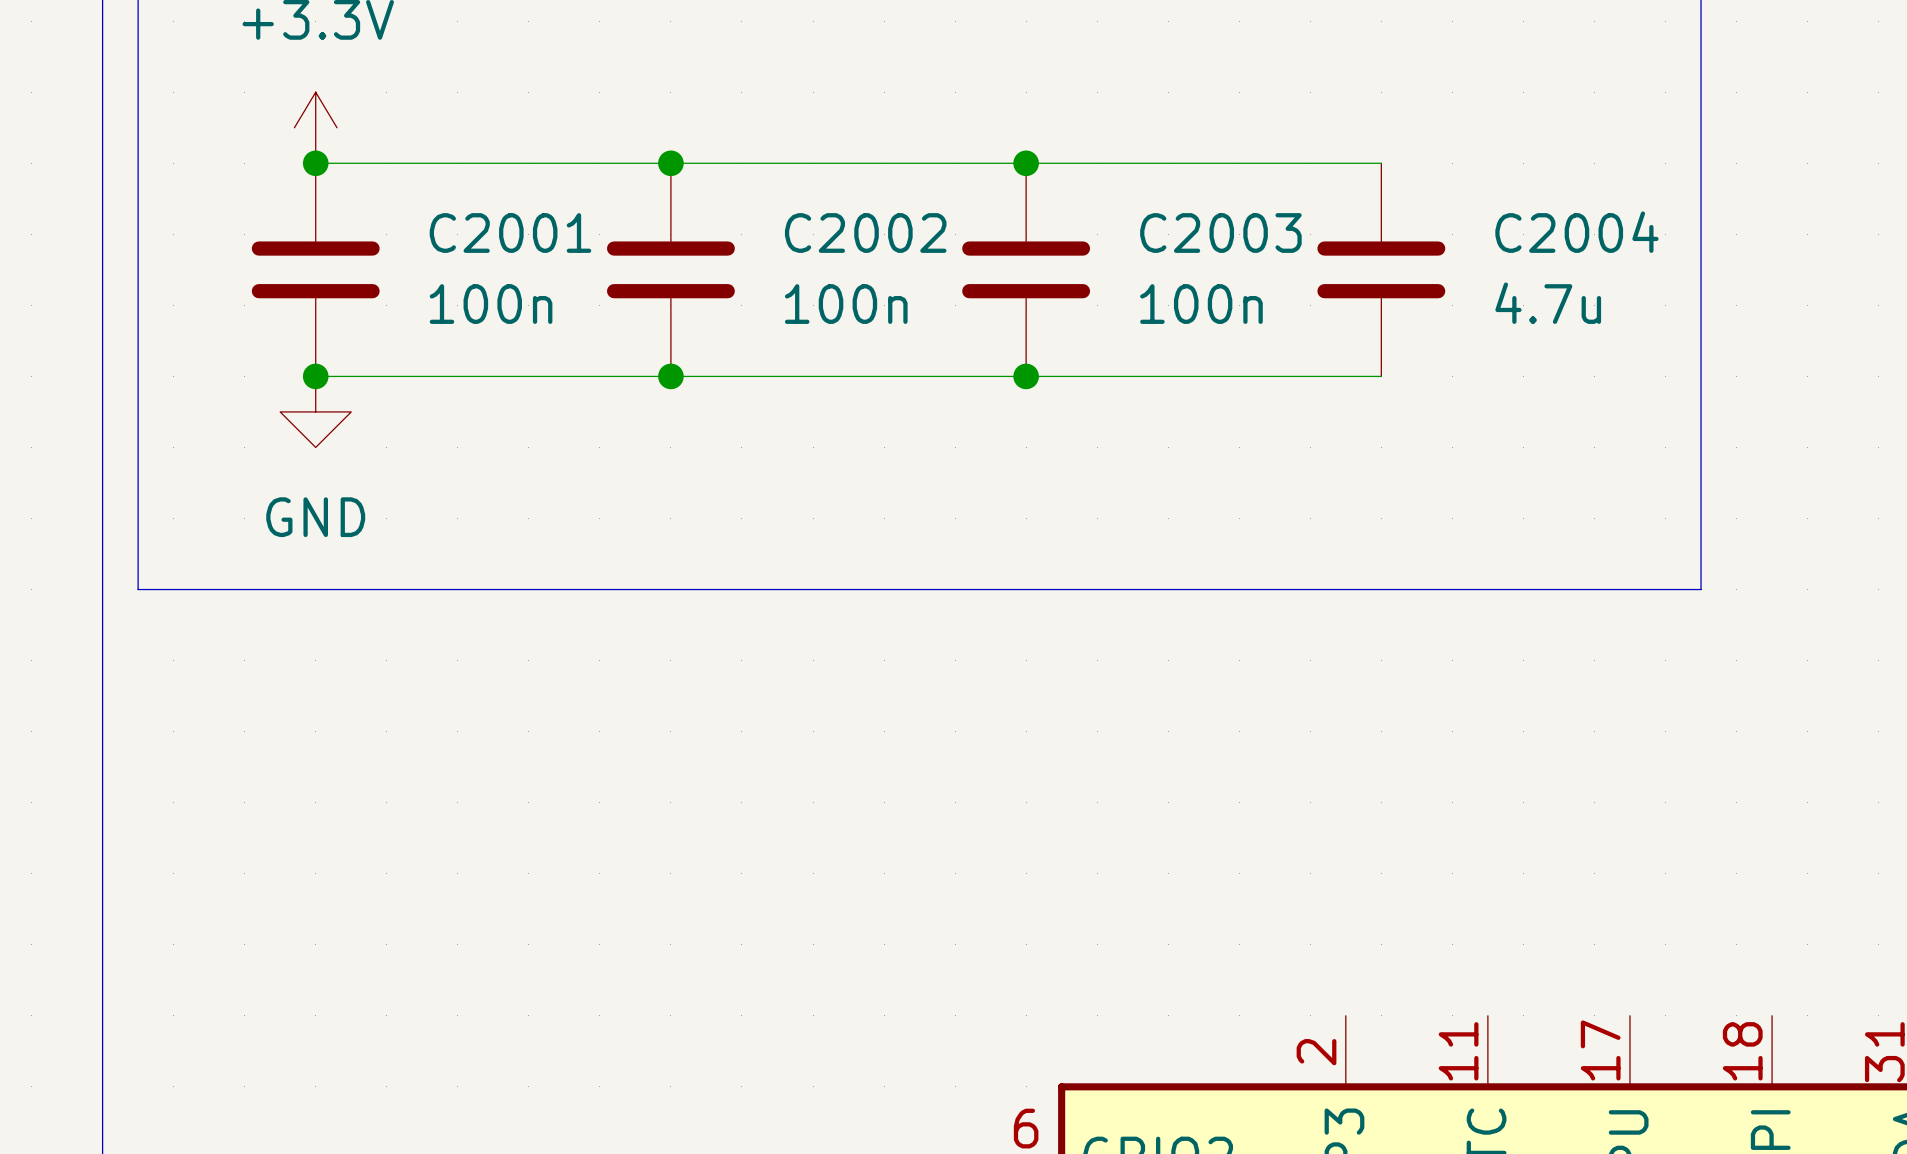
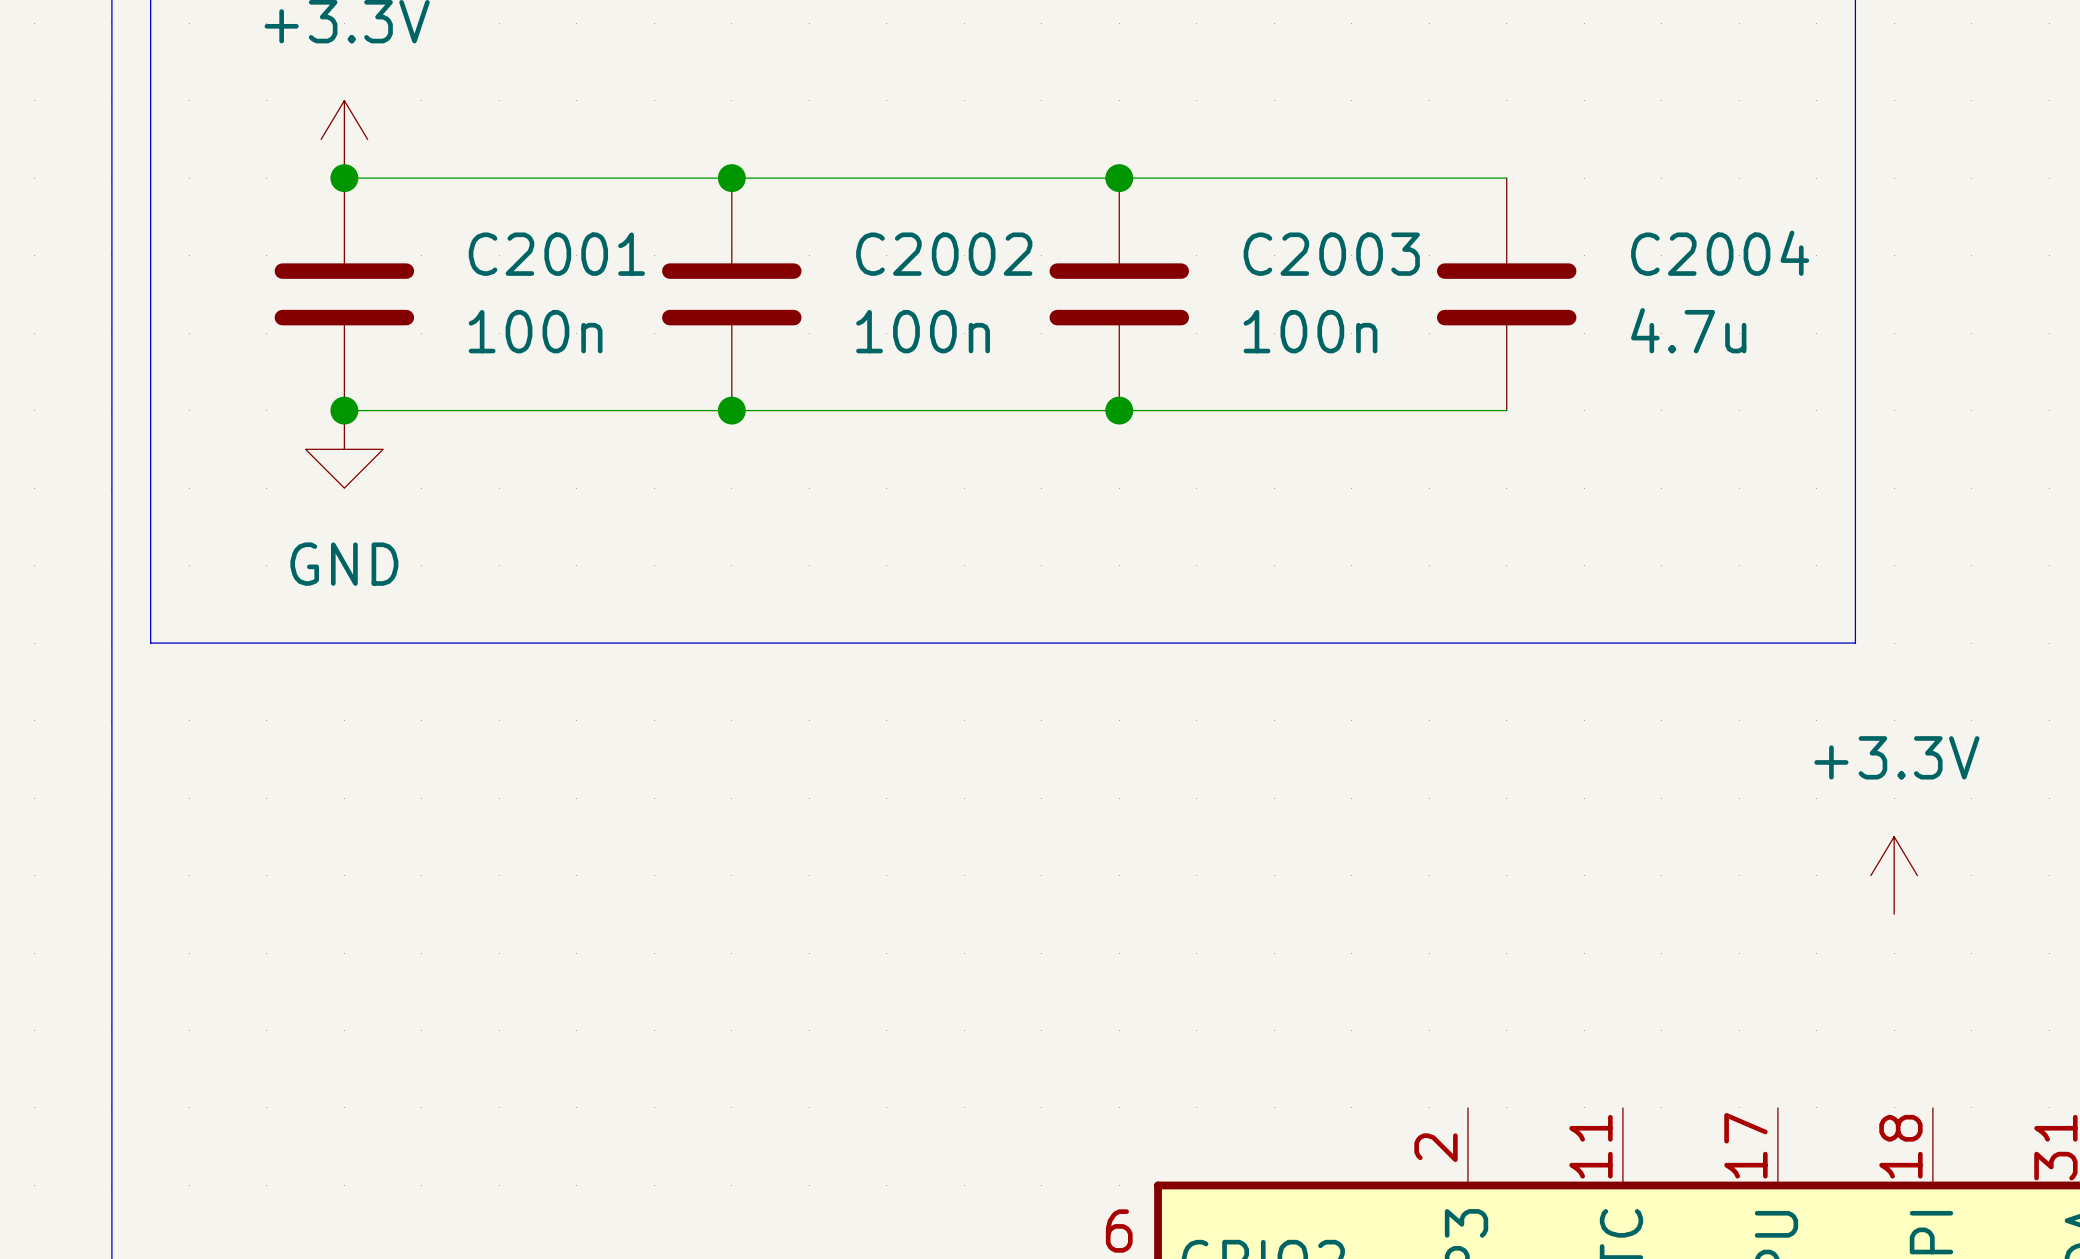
power symbol: none -> +3.3V (1894, 875)

